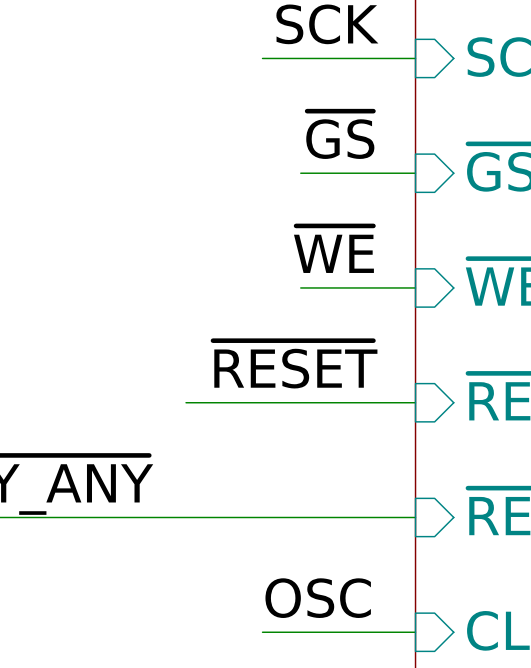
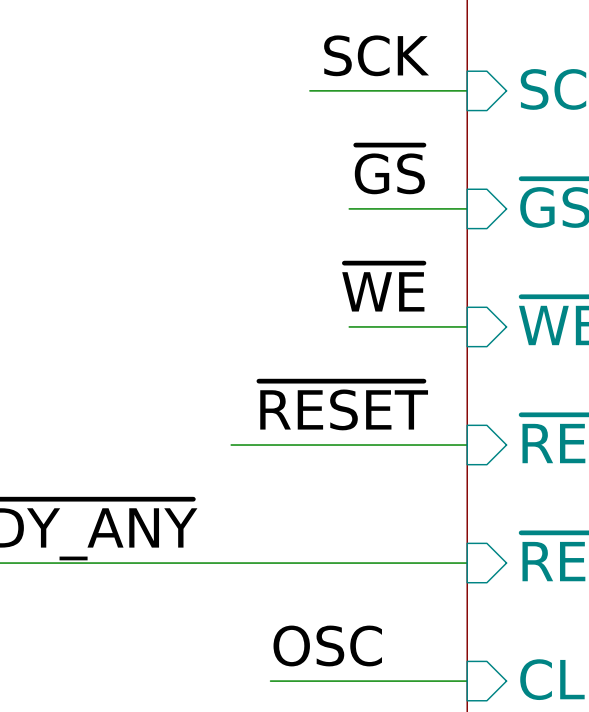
label position: OSC (318, 598) -> OSC (327, 646)
wire: none -> (270, 681) (309, 681)

